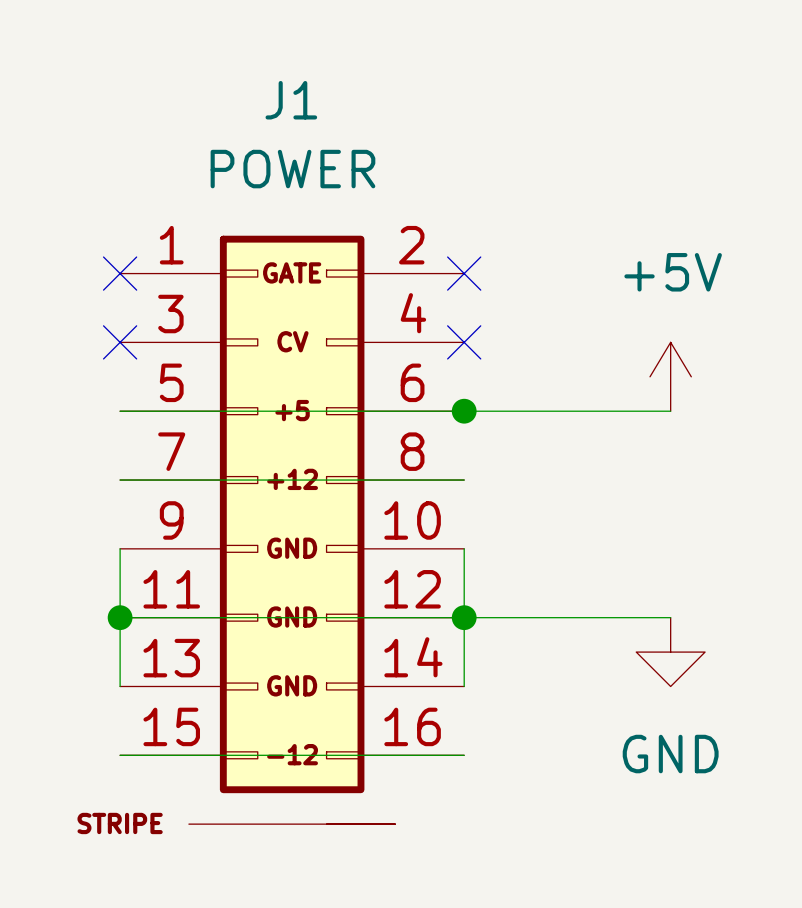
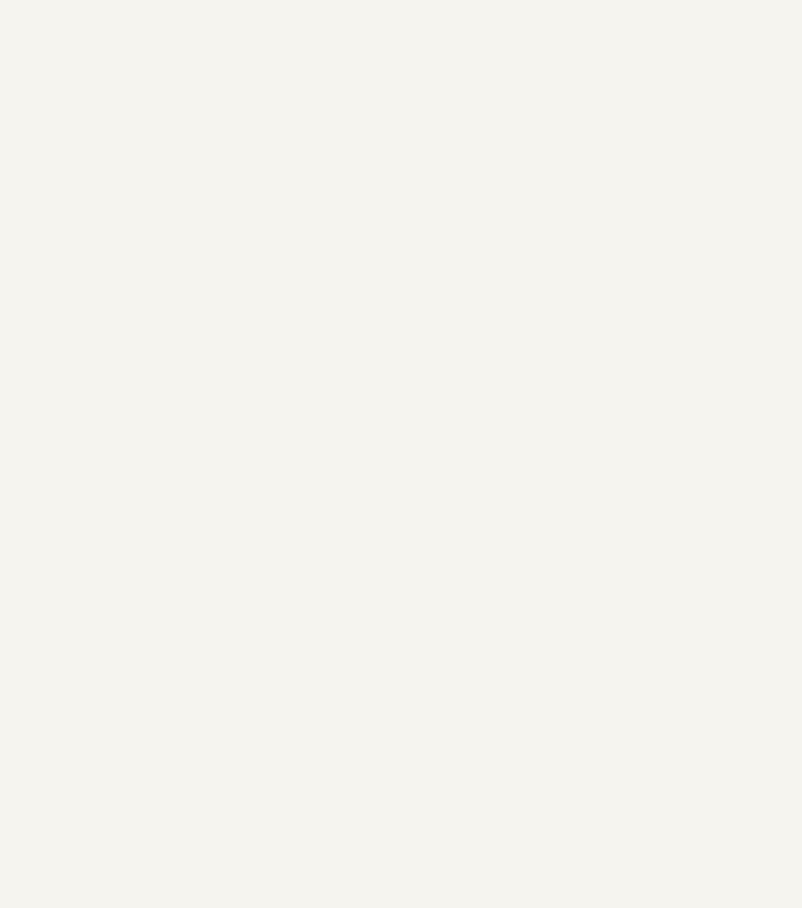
no-connect mark: (120, 273) -> none
no-connect mark: (464, 273) -> none
no-connect mark: (120, 342) -> none
no-connect mark: (464, 342) -> none
power symbol: +5V (670, 376) -> none
wire: (120, 411) (670, 411) -> none
junction: (464, 411) -> none
wire: (120, 480) (464, 480) -> none
J1: POWER (292, 529) -> none
wire: (120, 548) (120, 686) -> none
wire: (464, 548) (464, 686) -> none
wire: (120, 617) (670, 617) -> none
junction: (120, 617) -> none
junction: (464, 617) -> none
power symbol: GND (670, 652) -> none
wire: (120, 755) (464, 755) -> none

